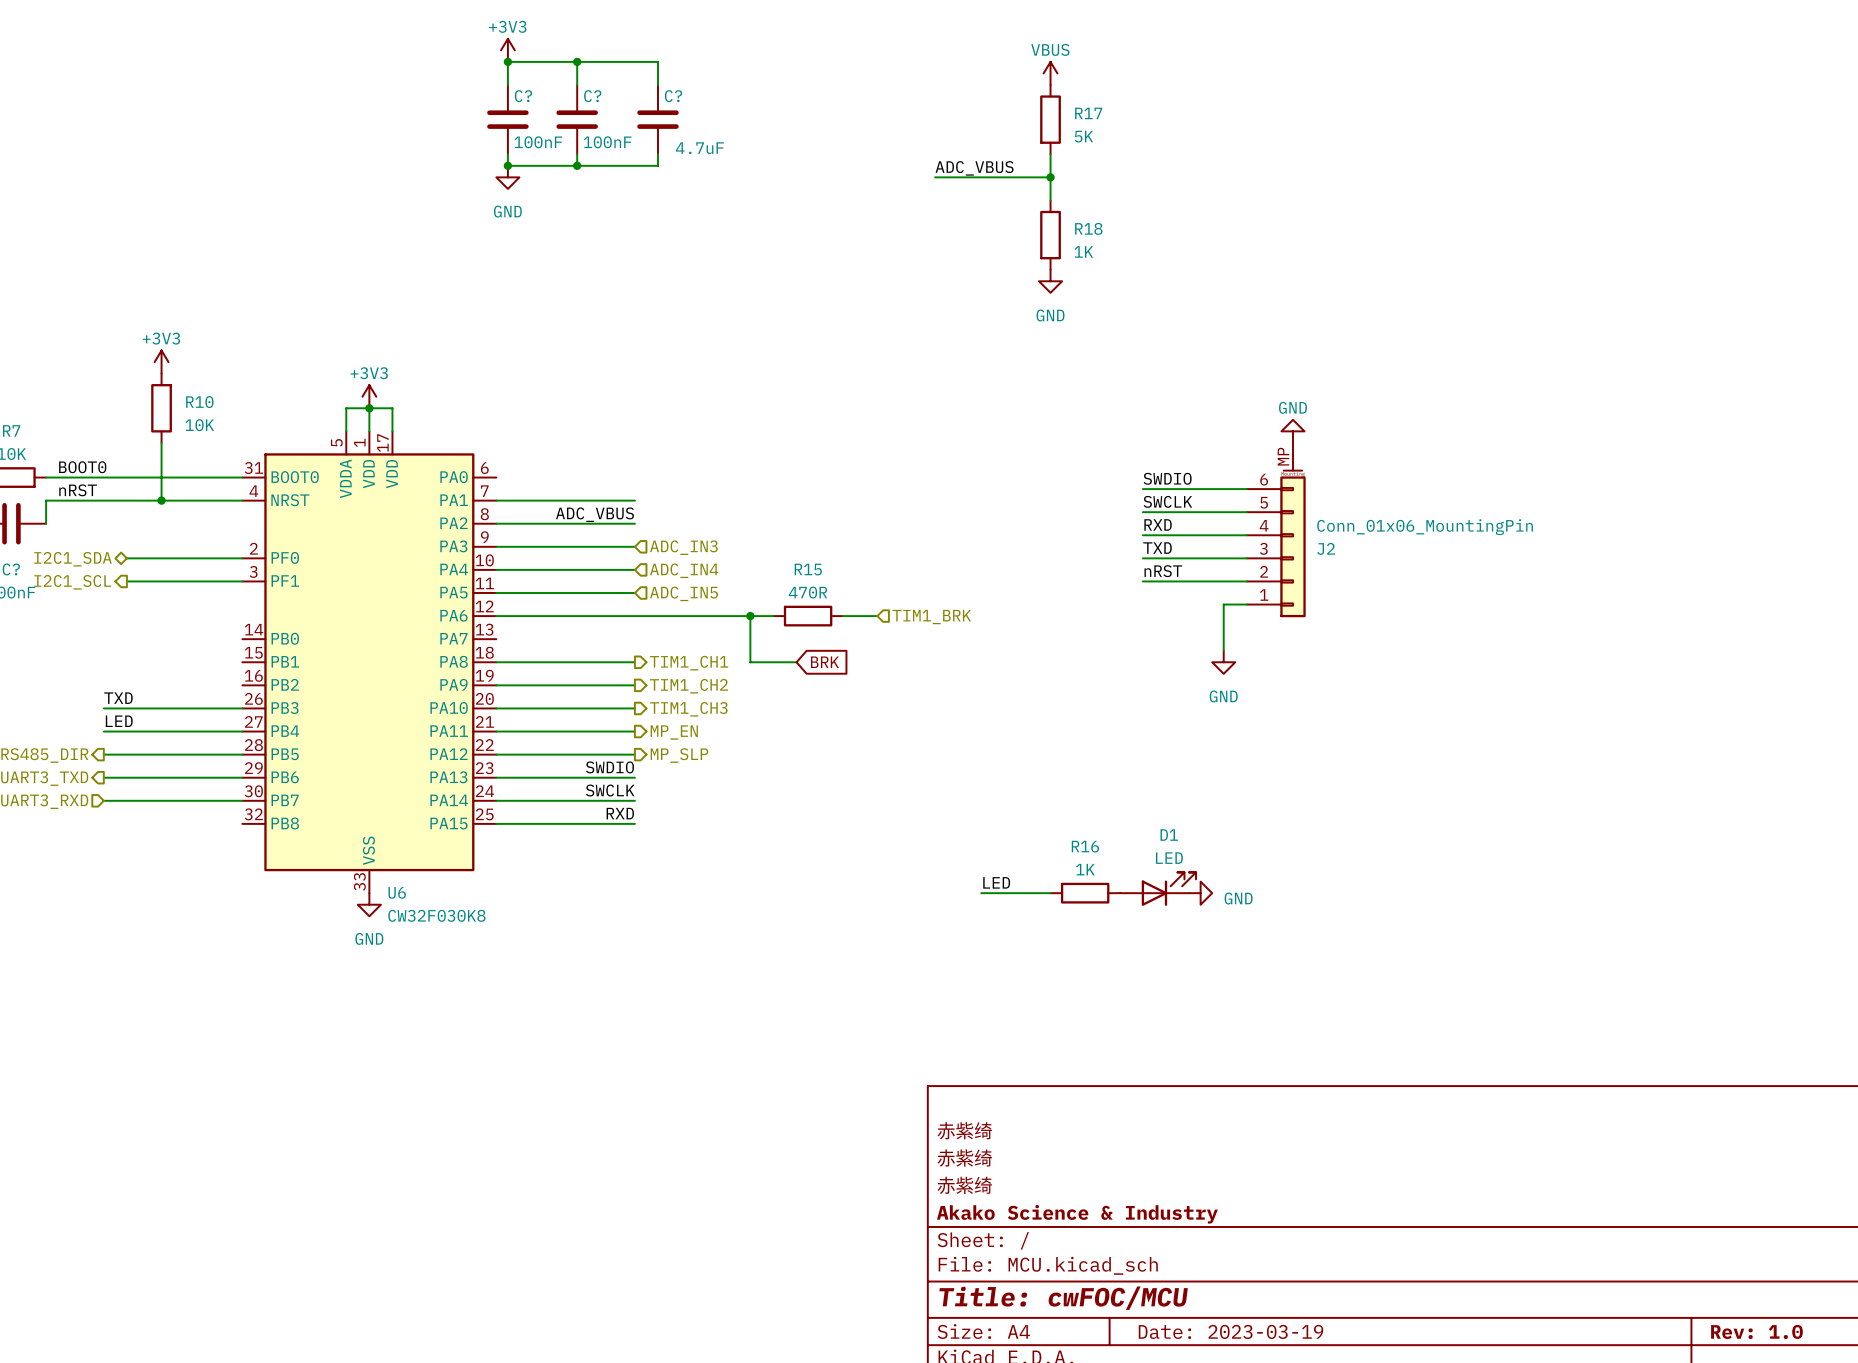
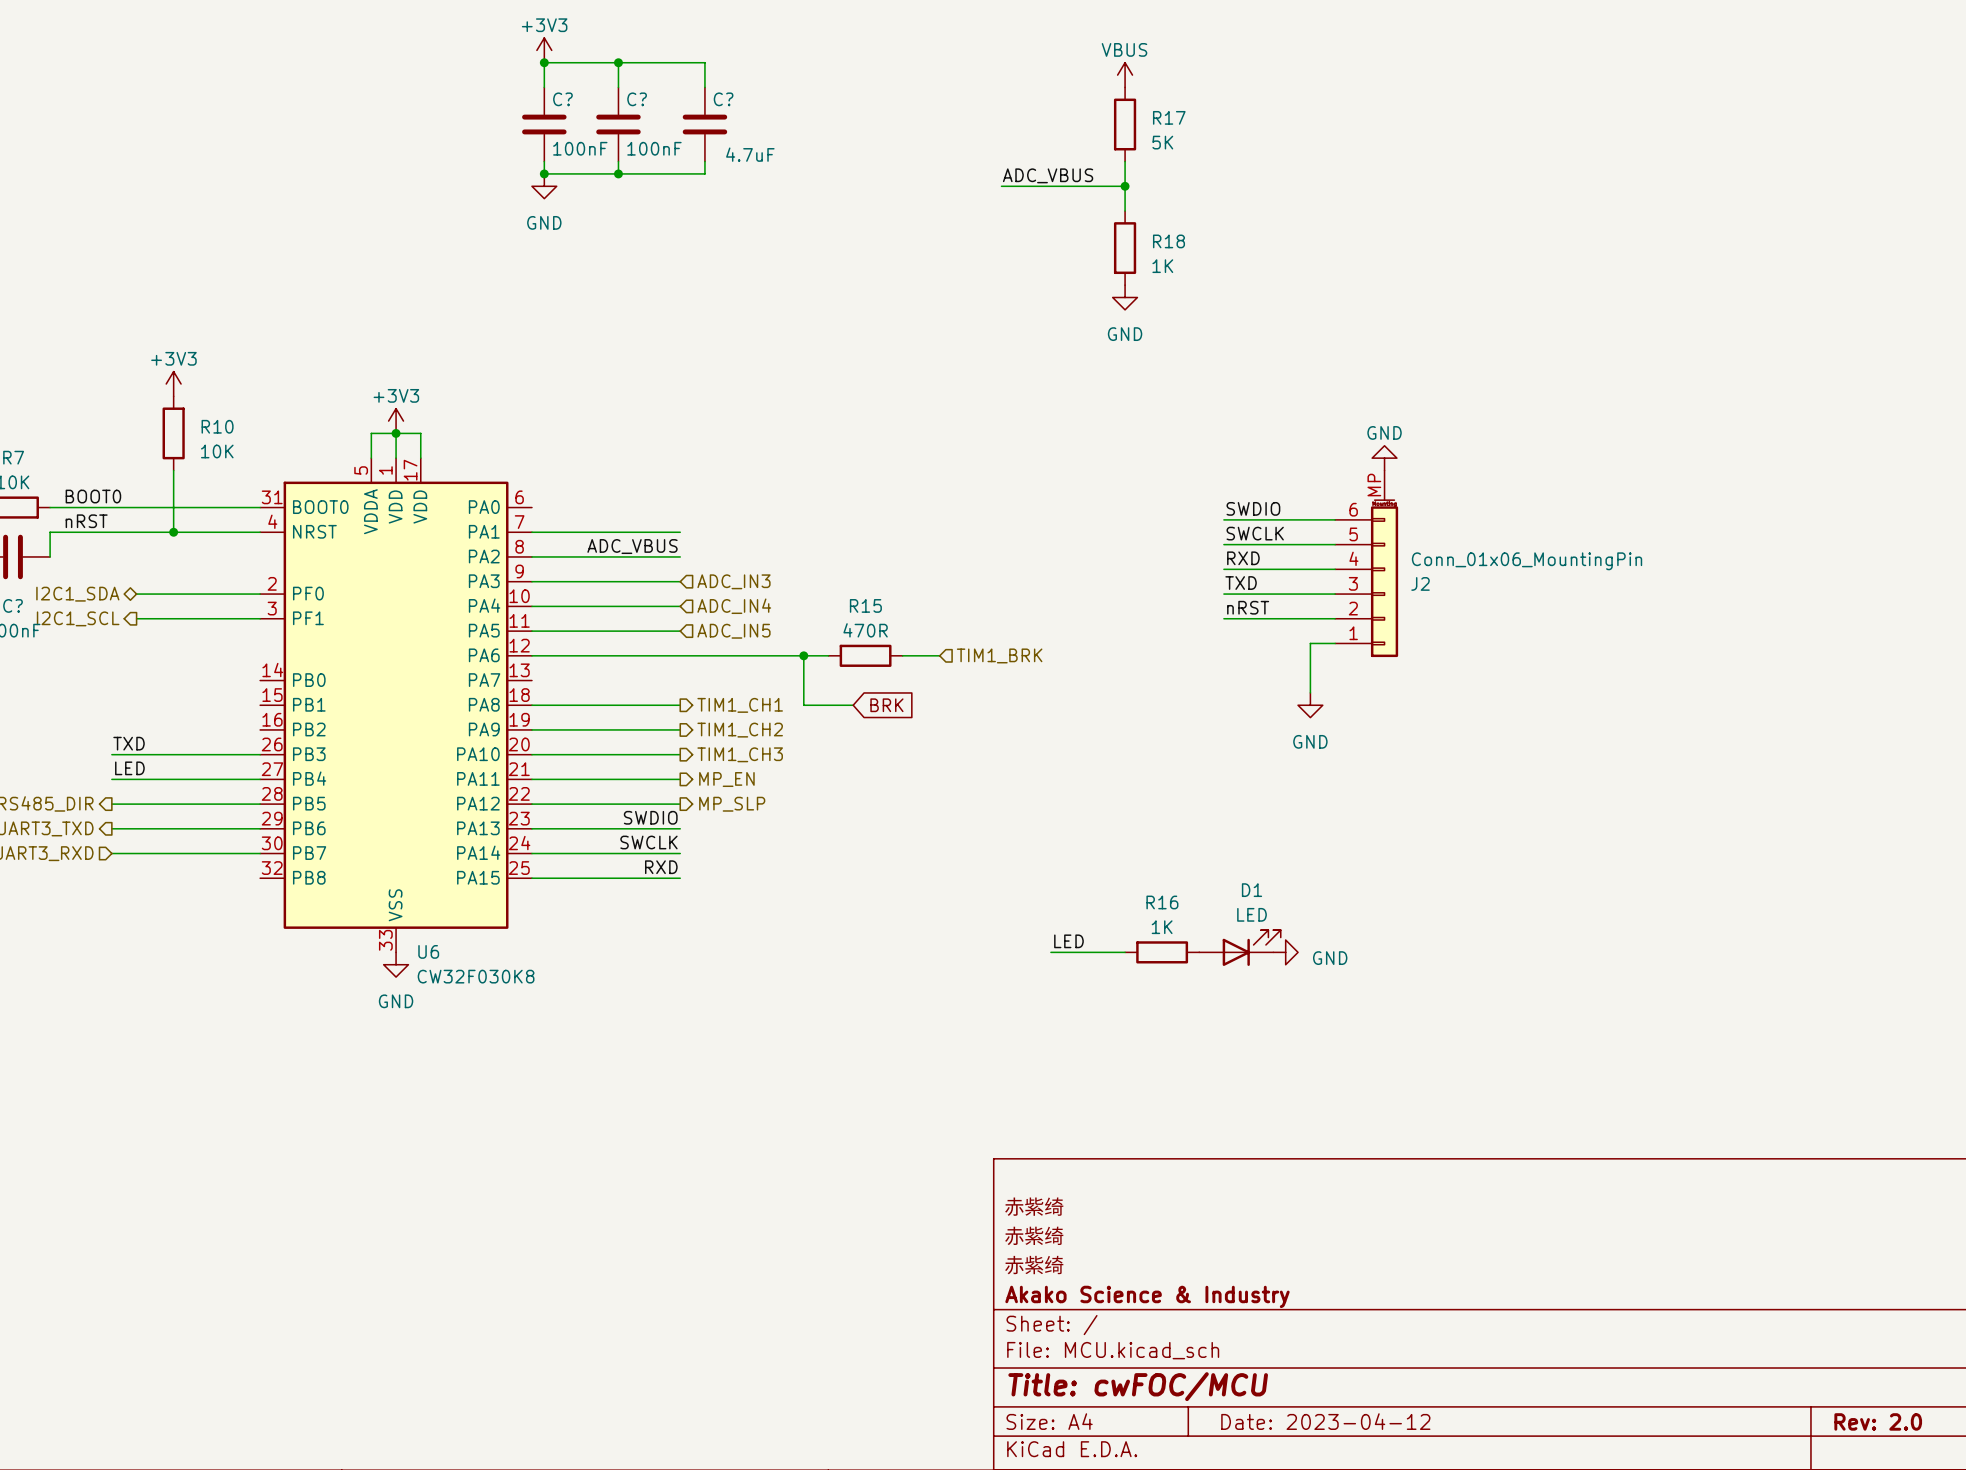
title block: Date: 2023-03-19 (1230, 1331) -> Date: 2023-04-12 (1325, 1421)
title block: Rev: 1.0 (1756, 1331) -> Rev: 2.0 (1878, 1421)

